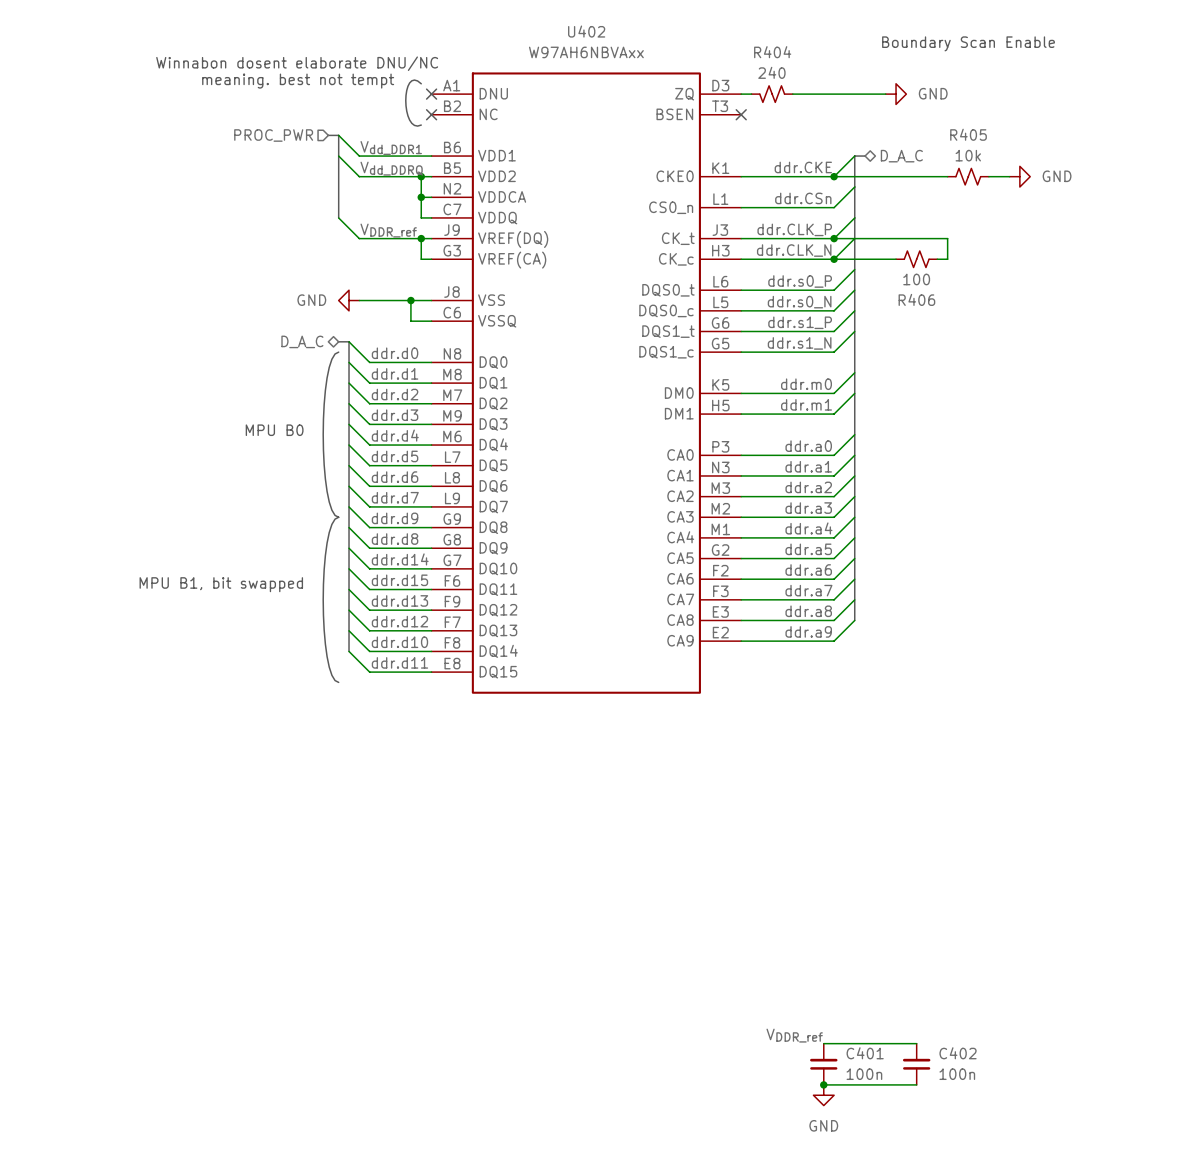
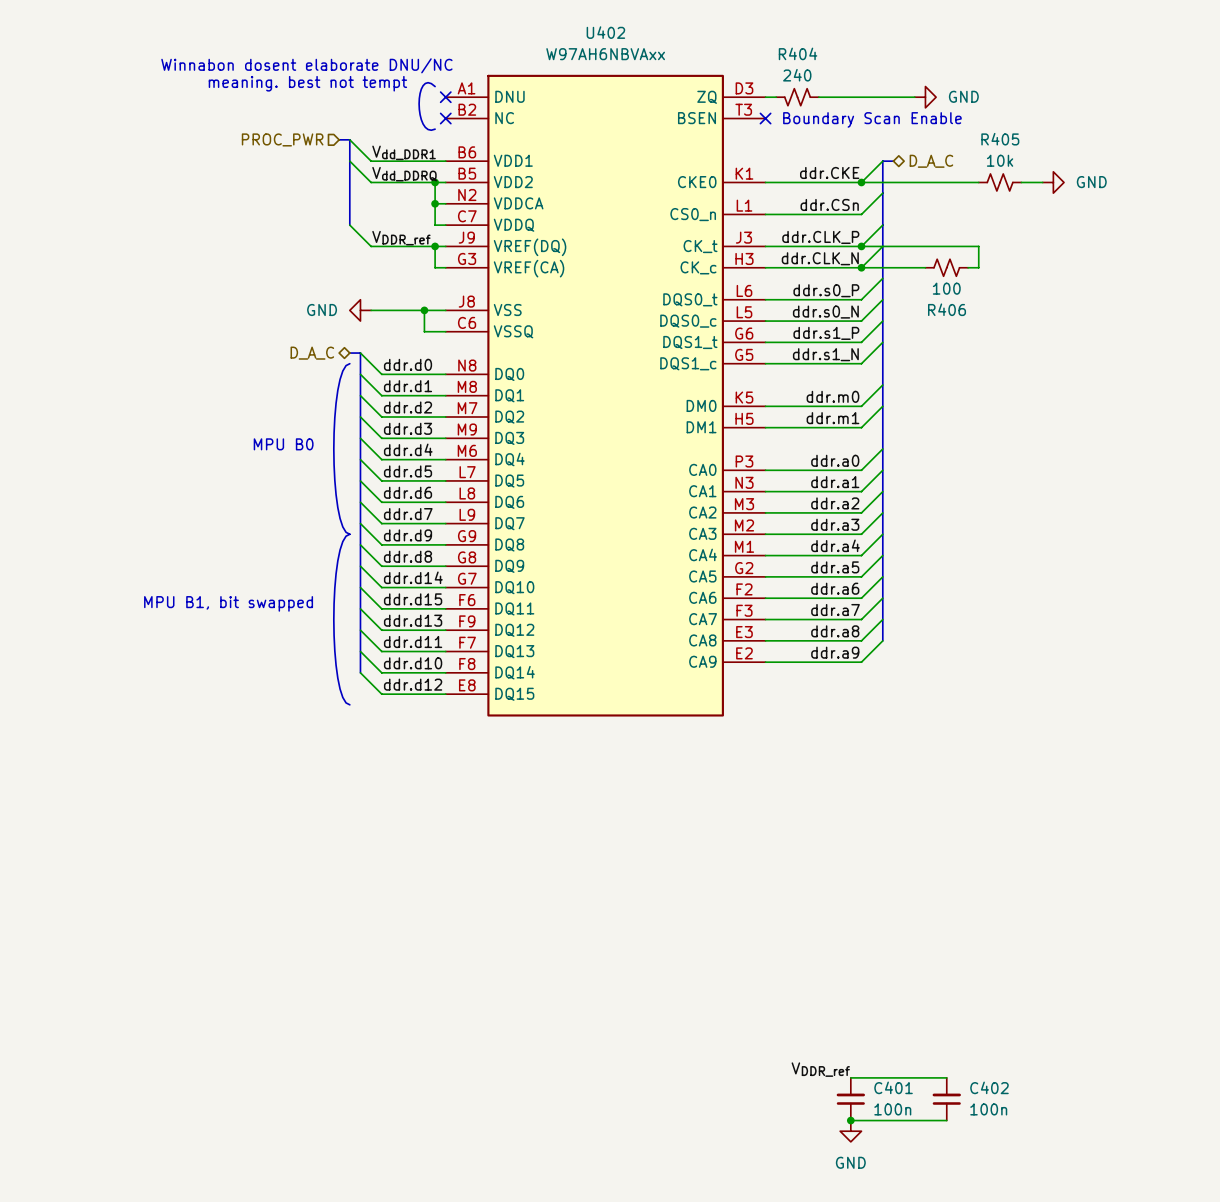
text: Boundary Scan Enable (968, 43) -> none
text: none -> Boundary Scan Enable (872, 119)
label: ddr.d12 (399, 621) -> ddr.d11 (413, 642)
label: ddr.d11 (399, 662) -> ddr.d12 (413, 684)

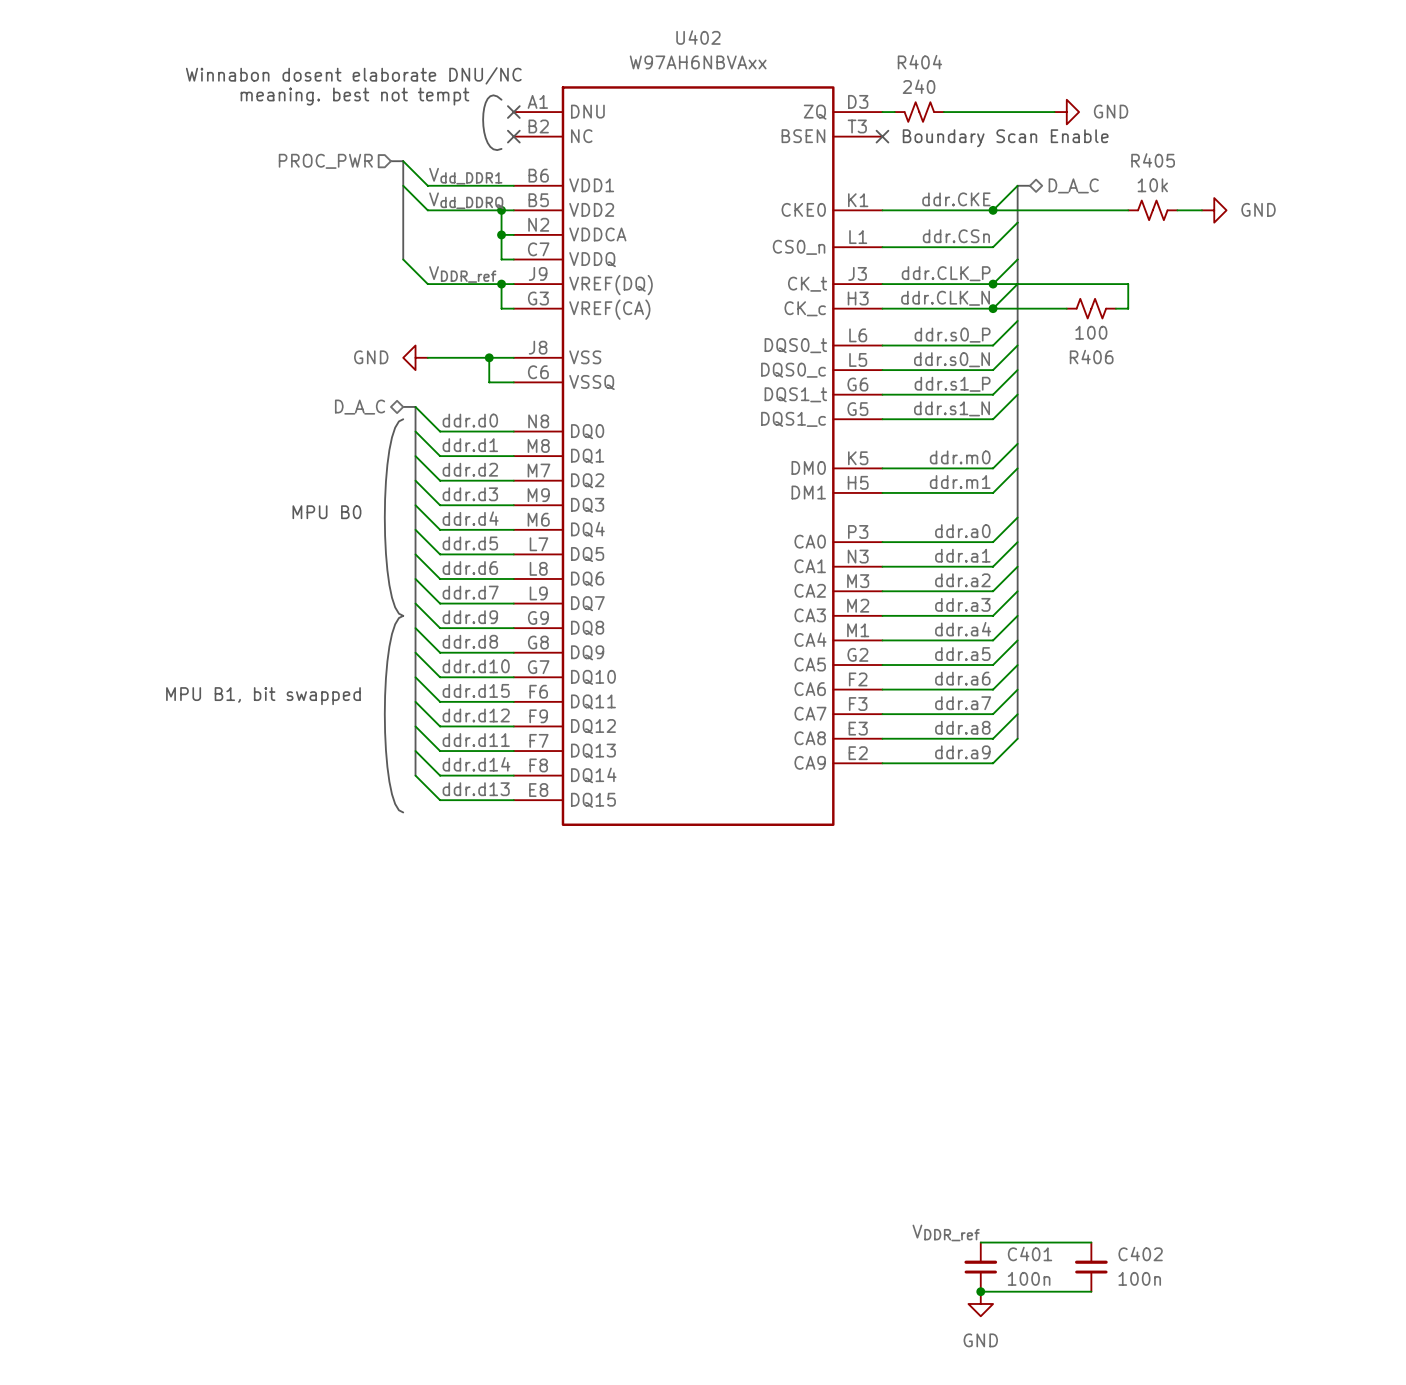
label: ddr.d14 (413, 577) -> ddr.d10 (476, 666)
label: ddr.d13 (413, 620) -> ddr.d12 (476, 715)
label: ddr.d10 (413, 663) -> ddr.d14 (476, 764)
label: ddr.d12 (413, 684) -> ddr.d13 (476, 789)

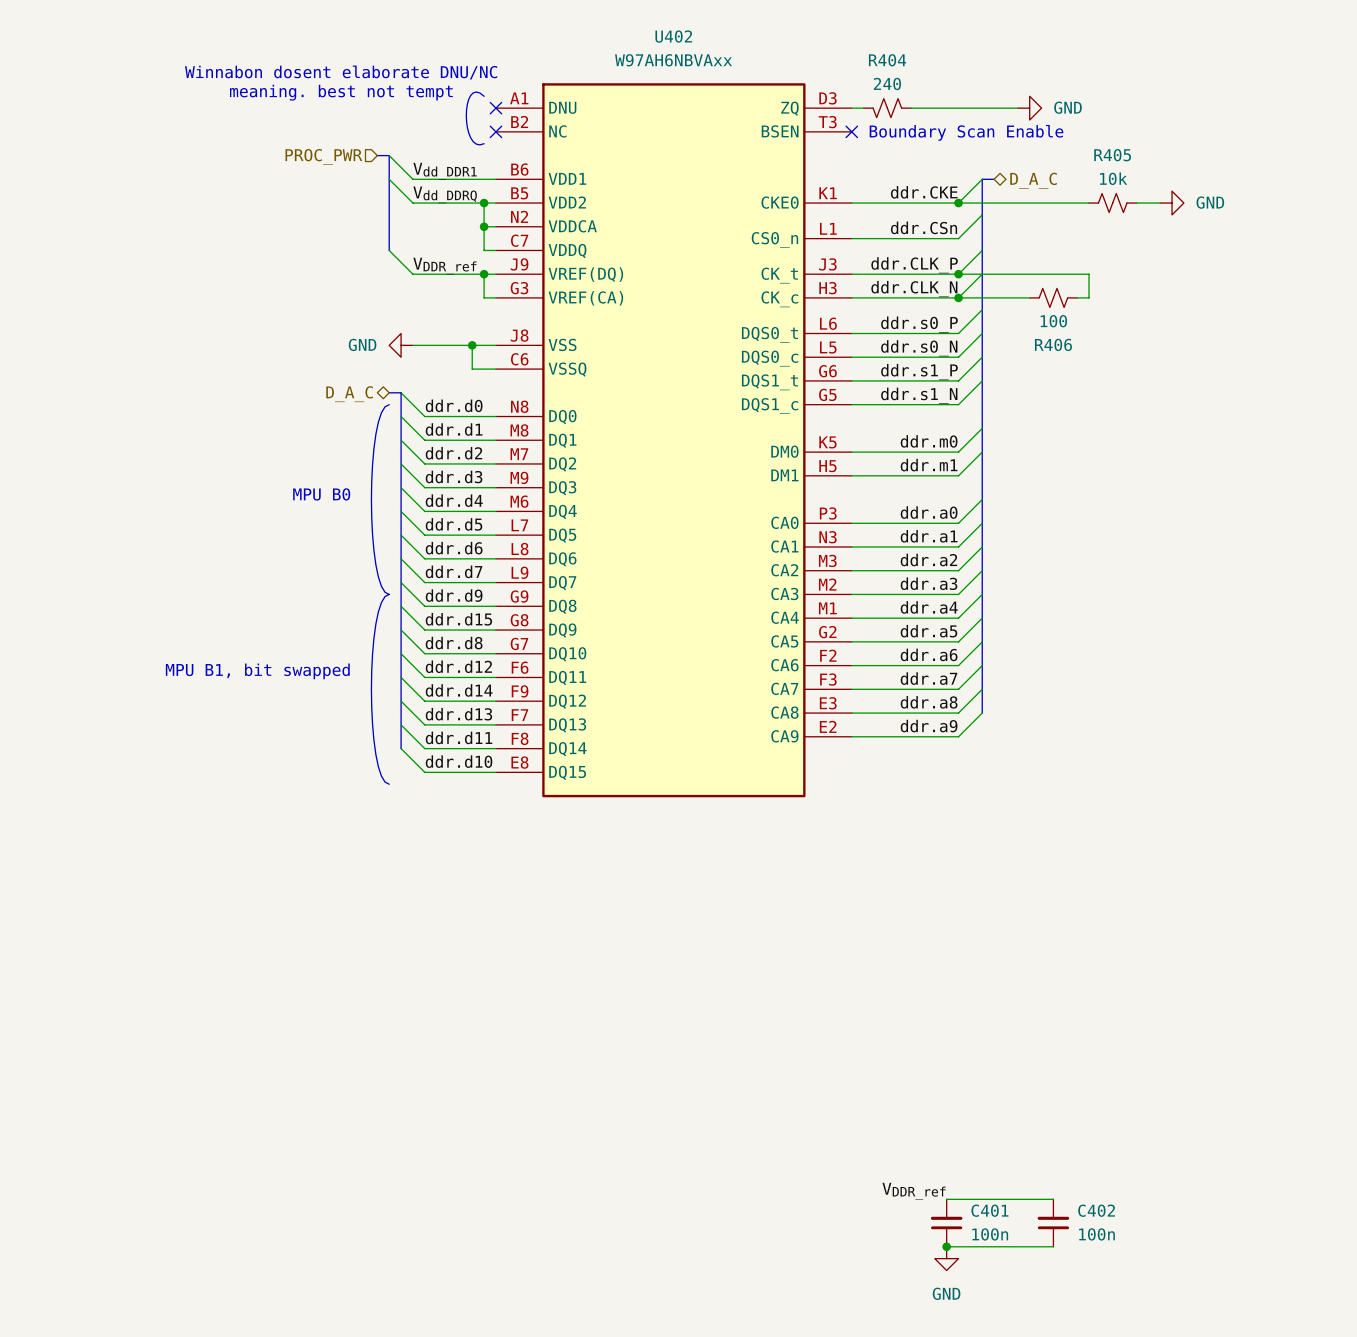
label: ddr.d8 (470, 641) -> ddr.d15 (458, 619)
label: ddr.d10 (476, 666) -> ddr.d8 (454, 643)
label: ddr.d15 (476, 690) -> ddr.d12 (458, 666)
label: ddr.d12 (476, 715) -> ddr.d14 (459, 690)
label: ddr.d11 (476, 740) -> ddr.d13 (458, 714)
label: ddr.d14 (476, 764) -> ddr.d11 (459, 737)
label: ddr.d13 (476, 789) -> ddr.d10 (459, 761)

